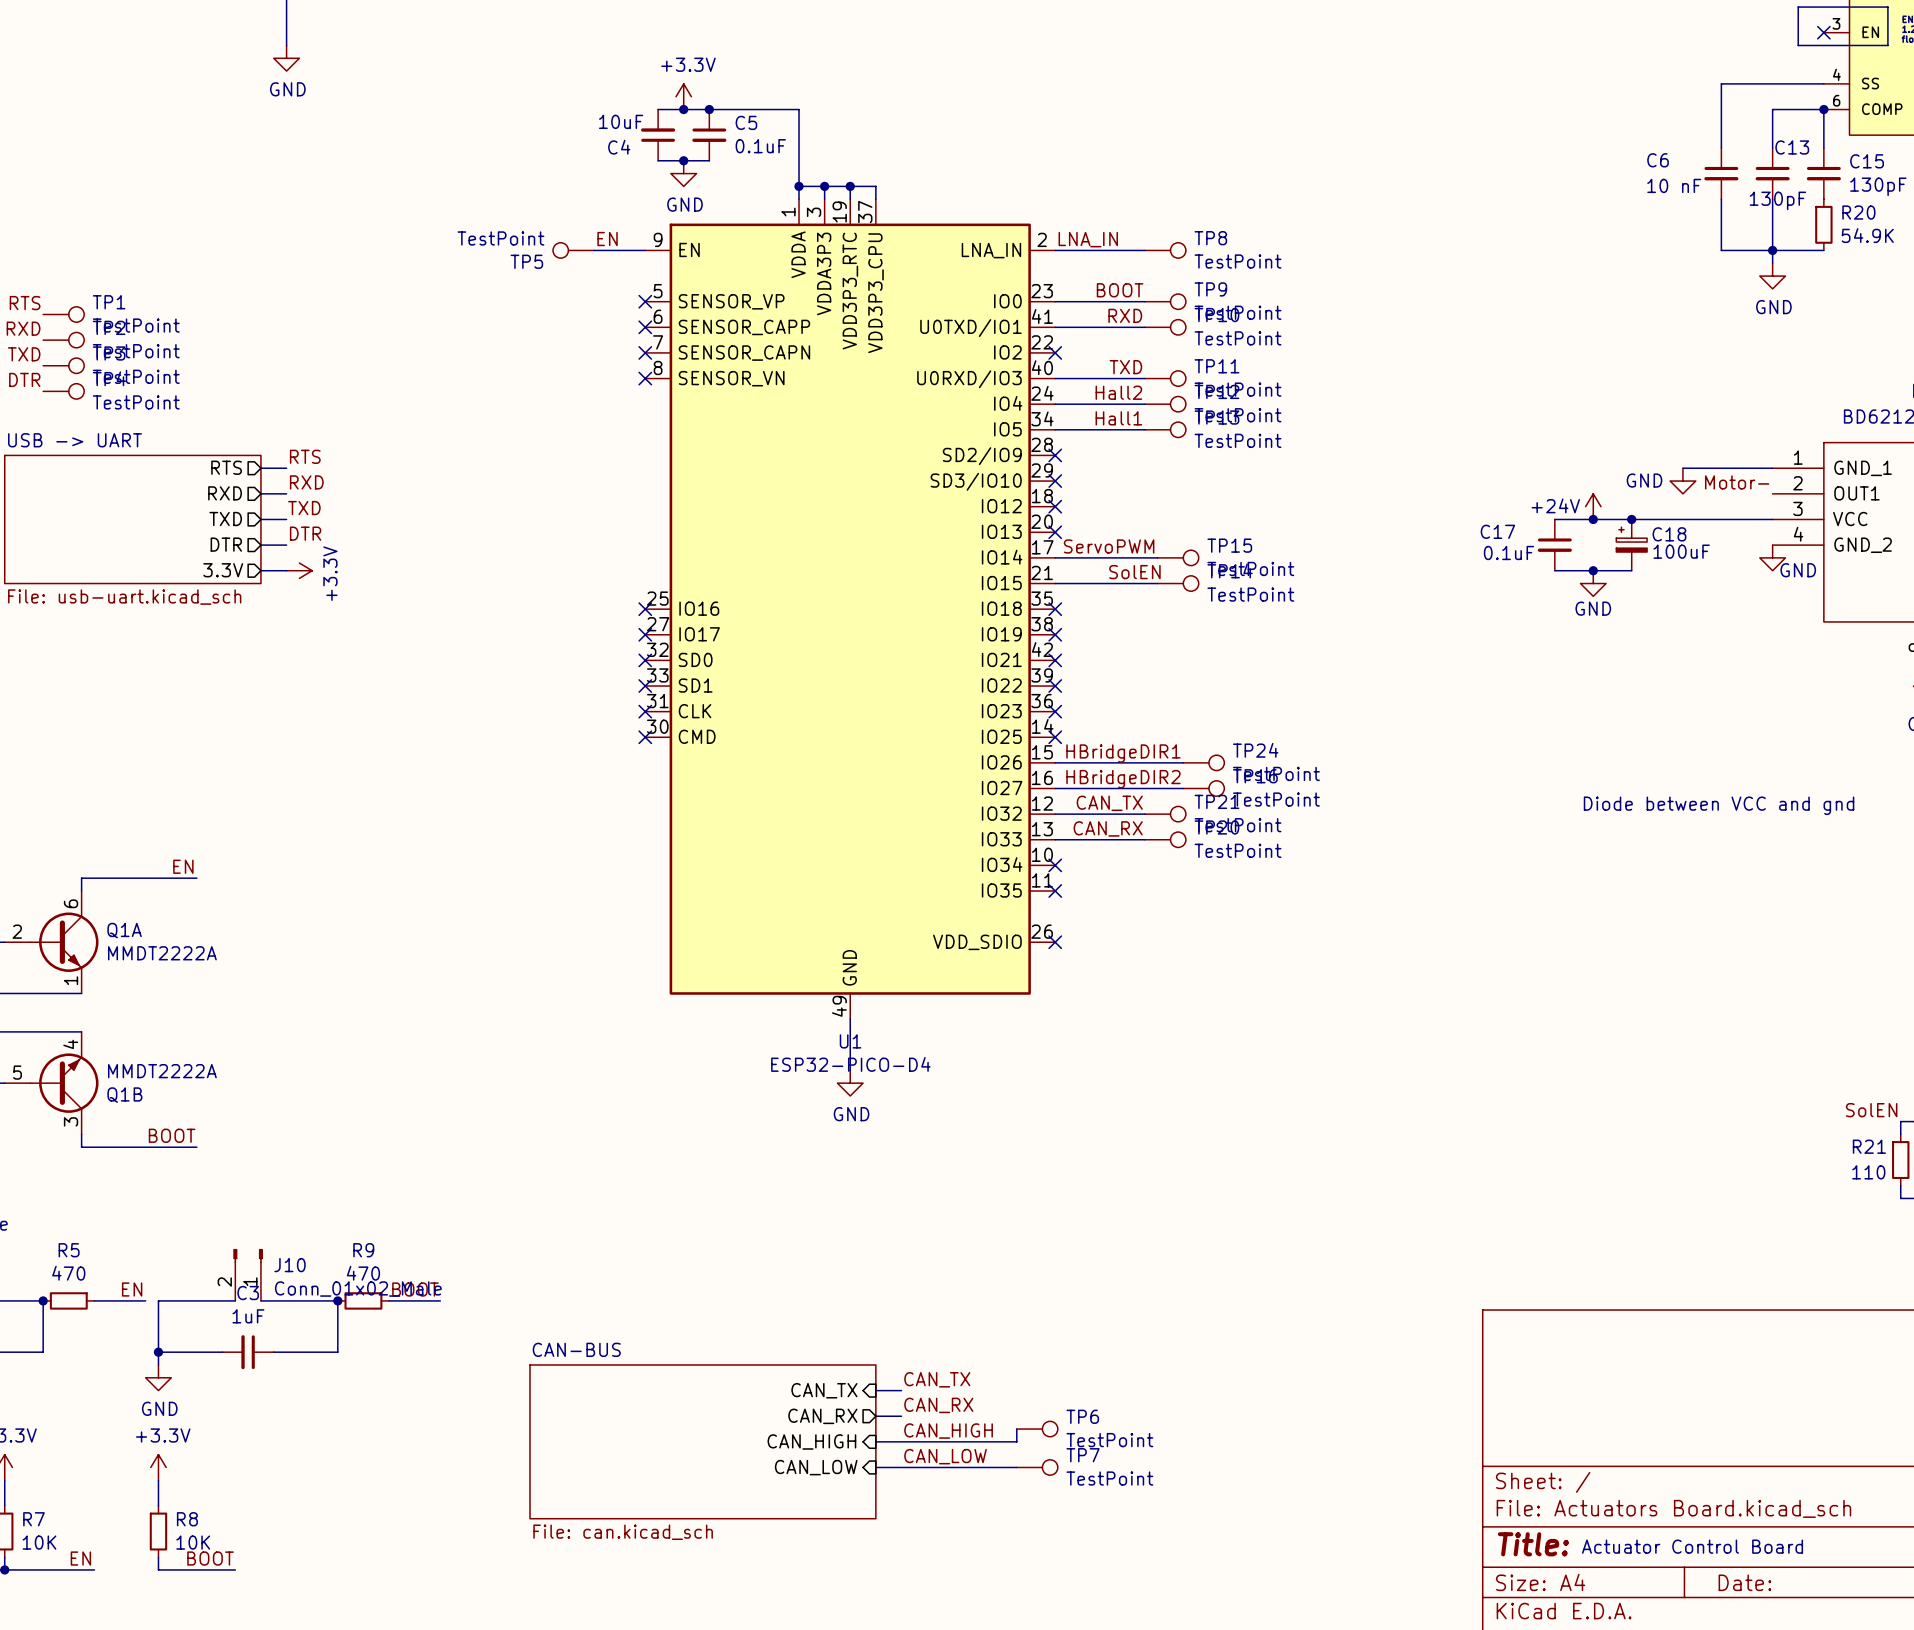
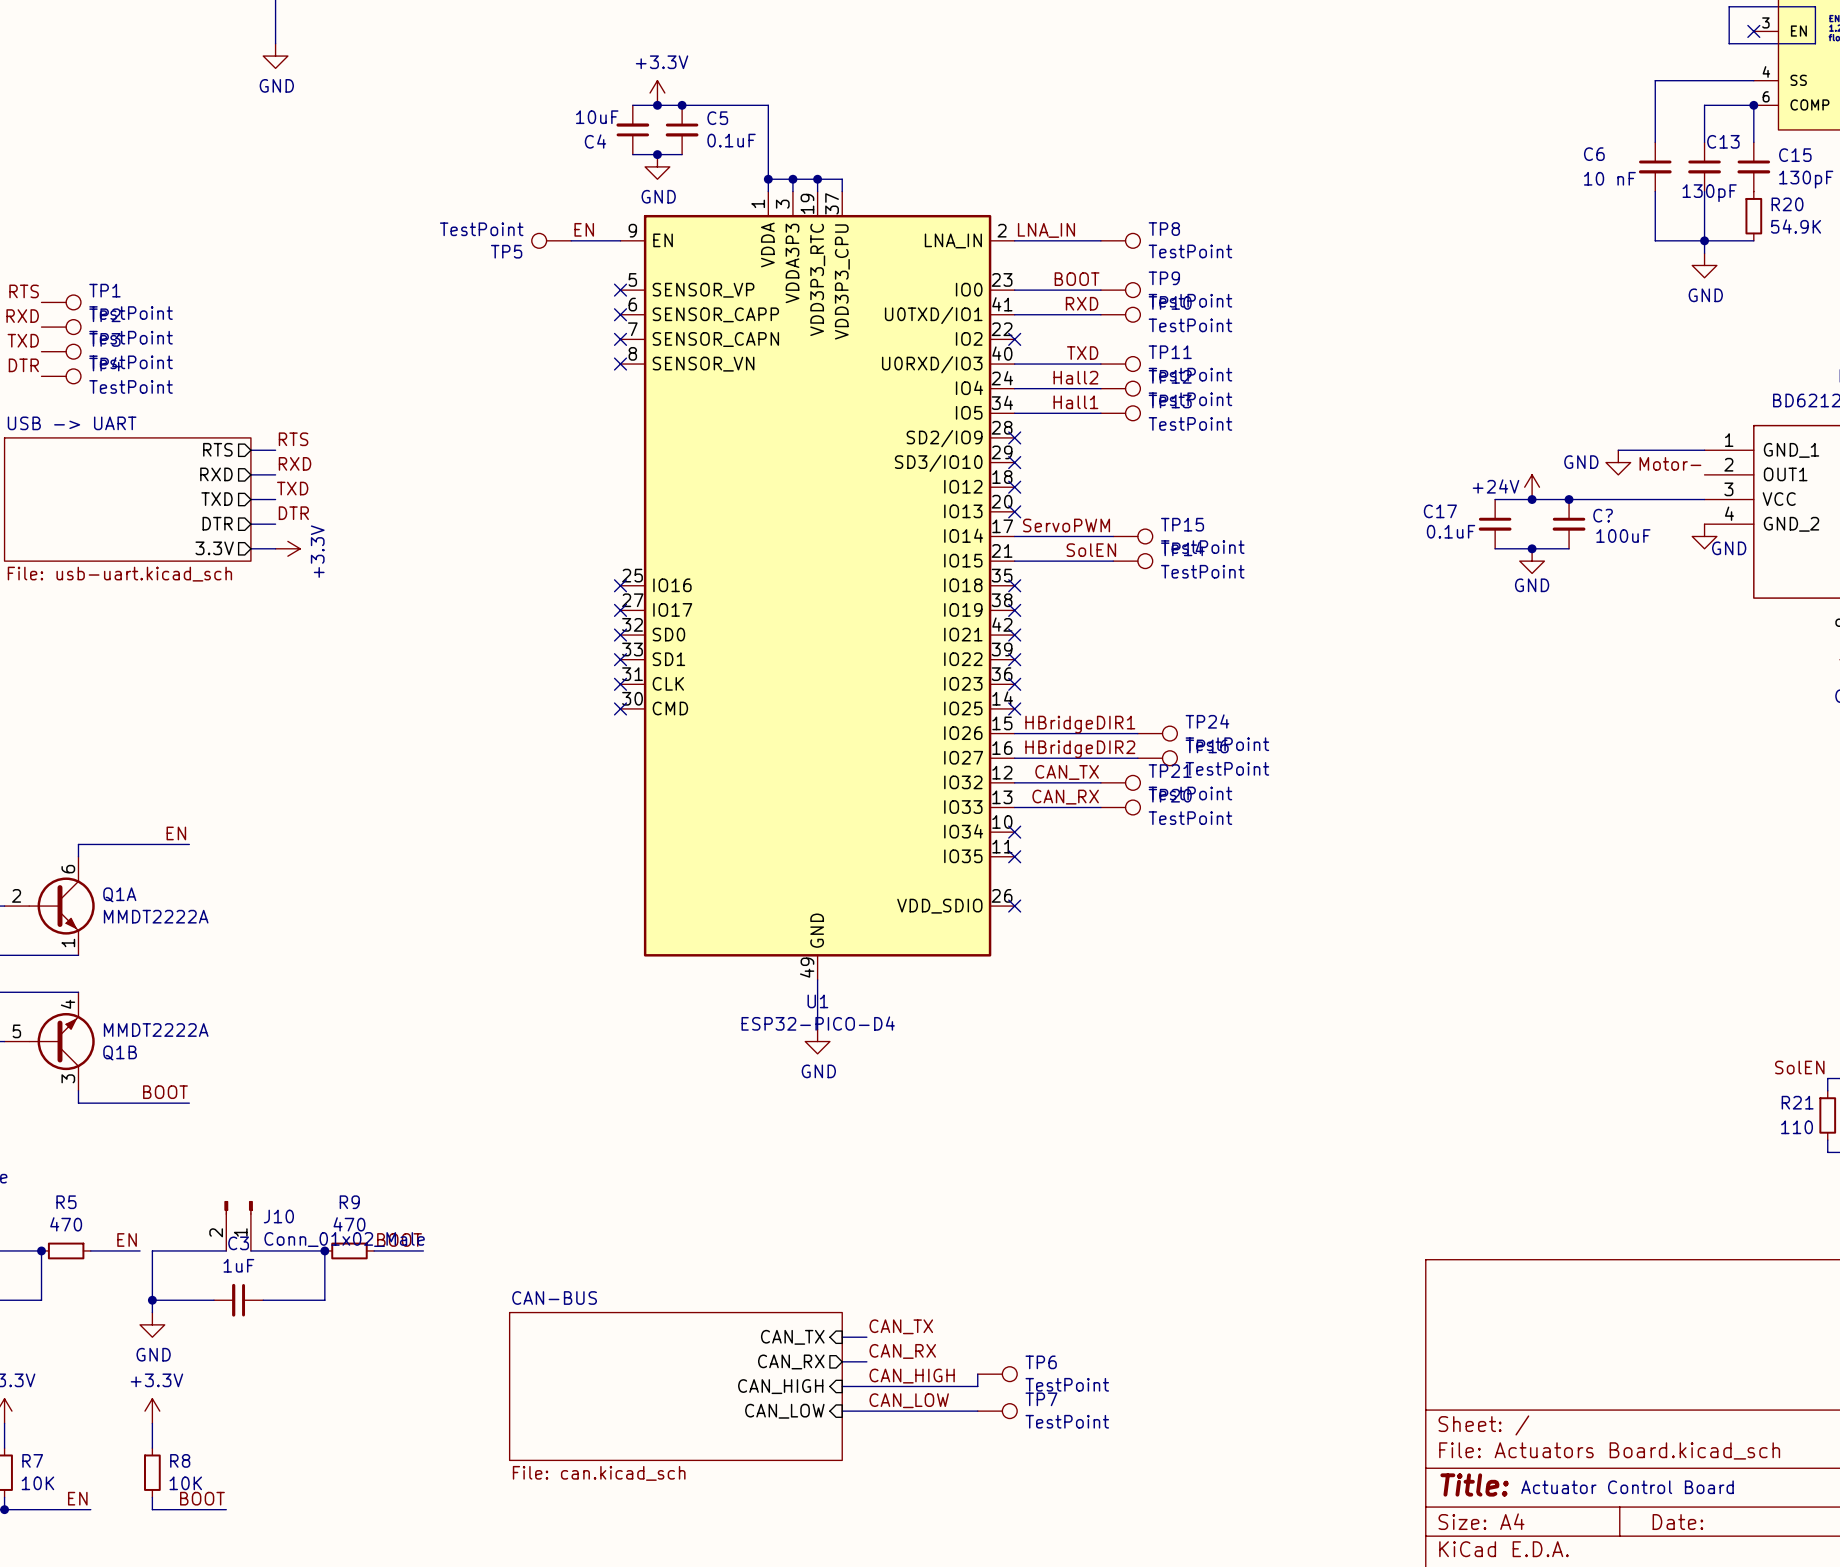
C18: 100uF (1631, 545) -> none
C?: none -> 100uF (1569, 524)
text: Diode between VCC and gnd (1719, 805) -> none

